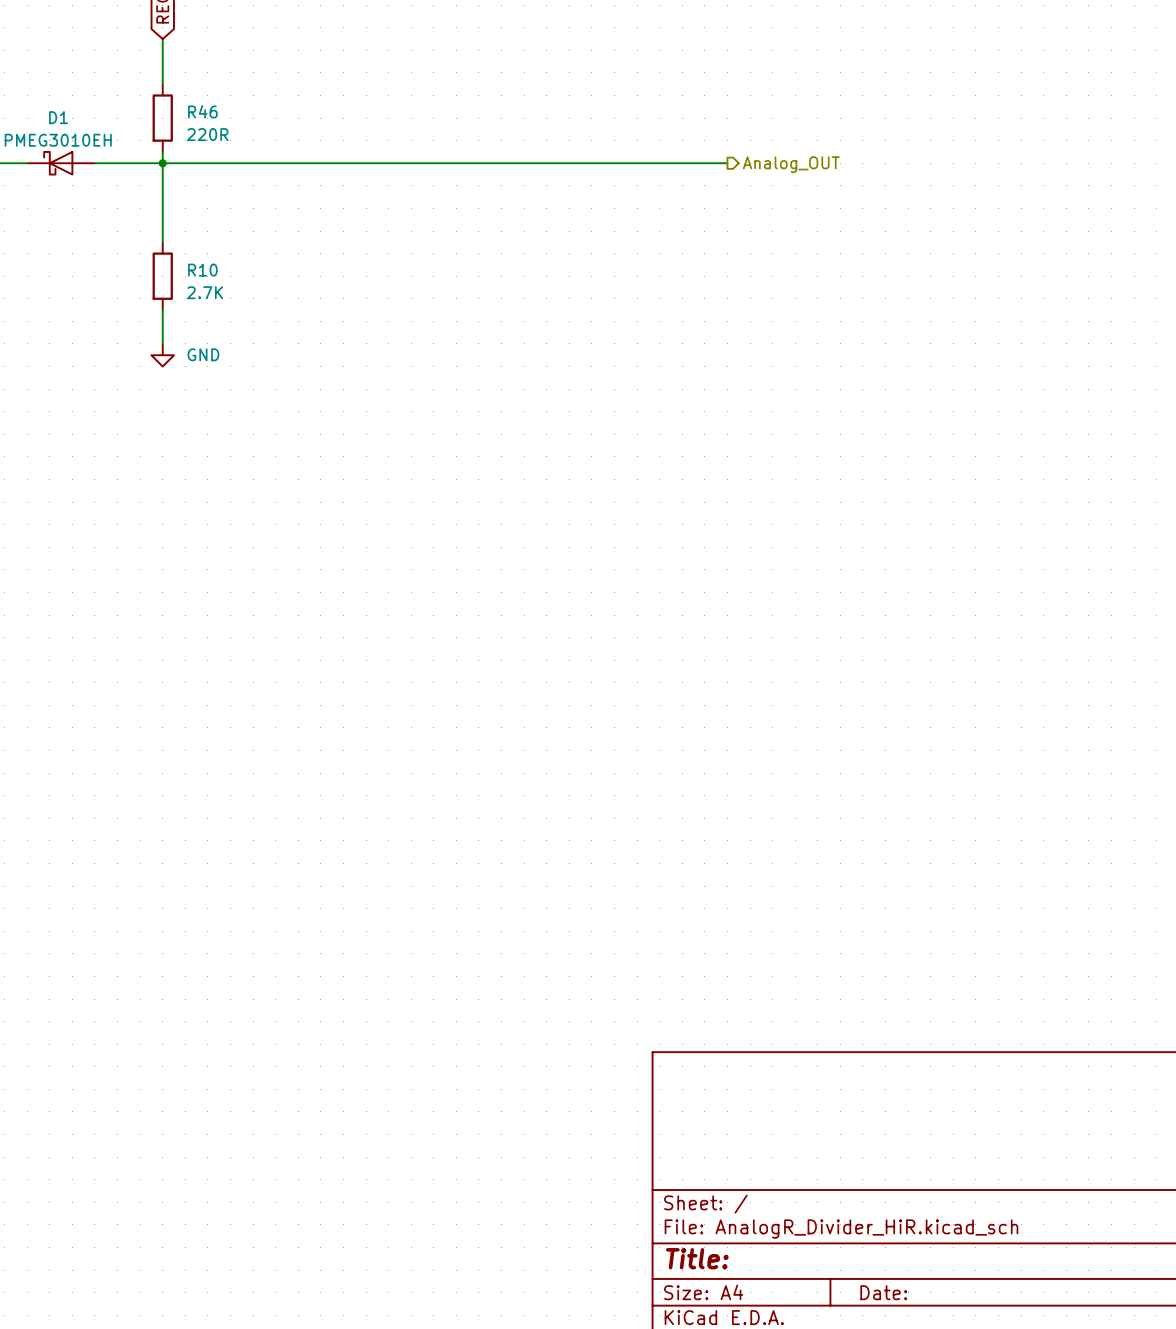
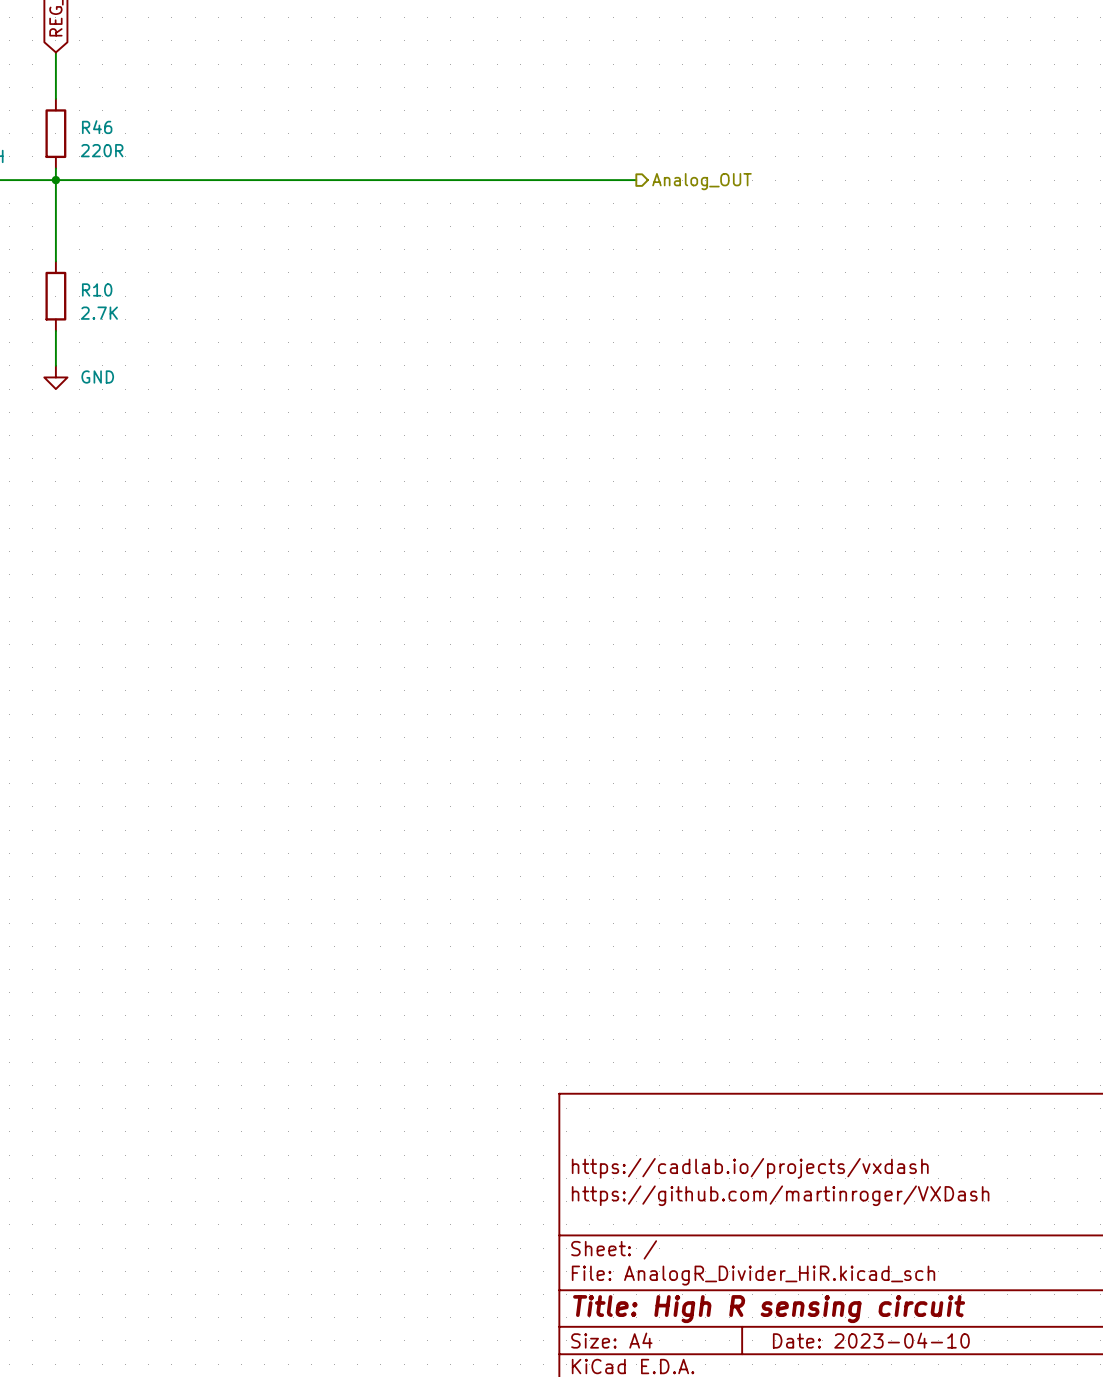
title block: none -> https://cadlab.io/projects/vxdash (750, 1168)
title block: none -> https://github.com/martinroger/VXDash (780, 1195)
title block: Title: (697, 1258) -> Title: High R sensing circuit (769, 1309)
title block: Date: (883, 1292) -> Date: 2023-04-10 (871, 1340)

